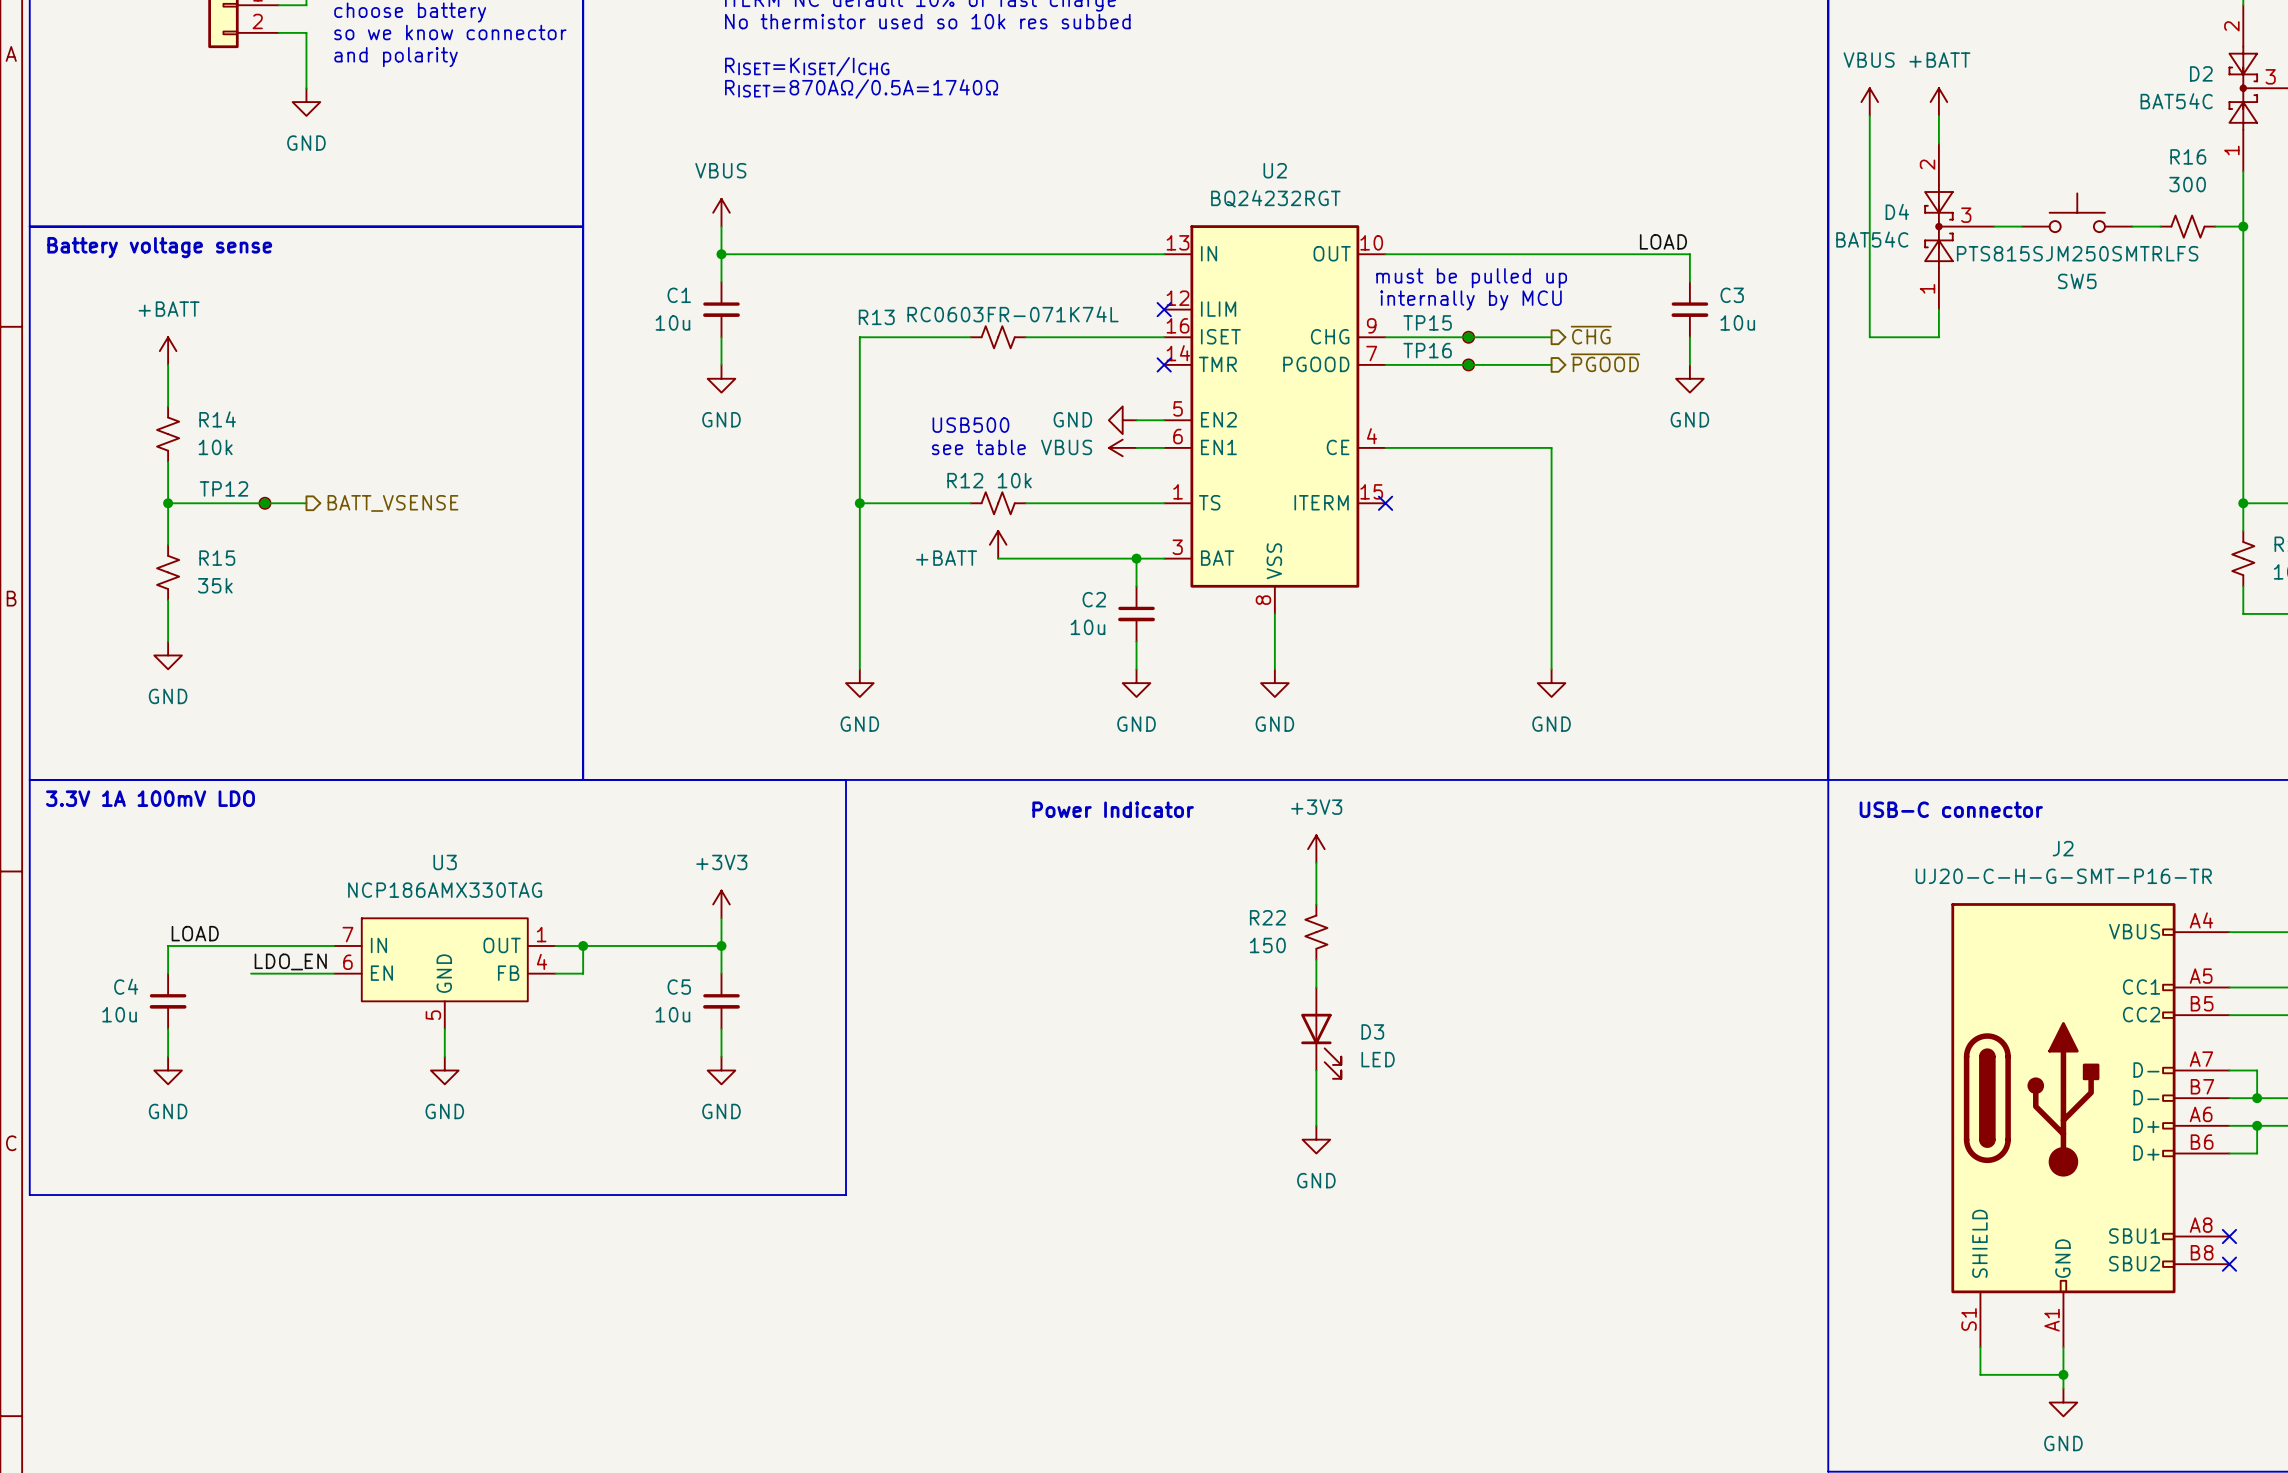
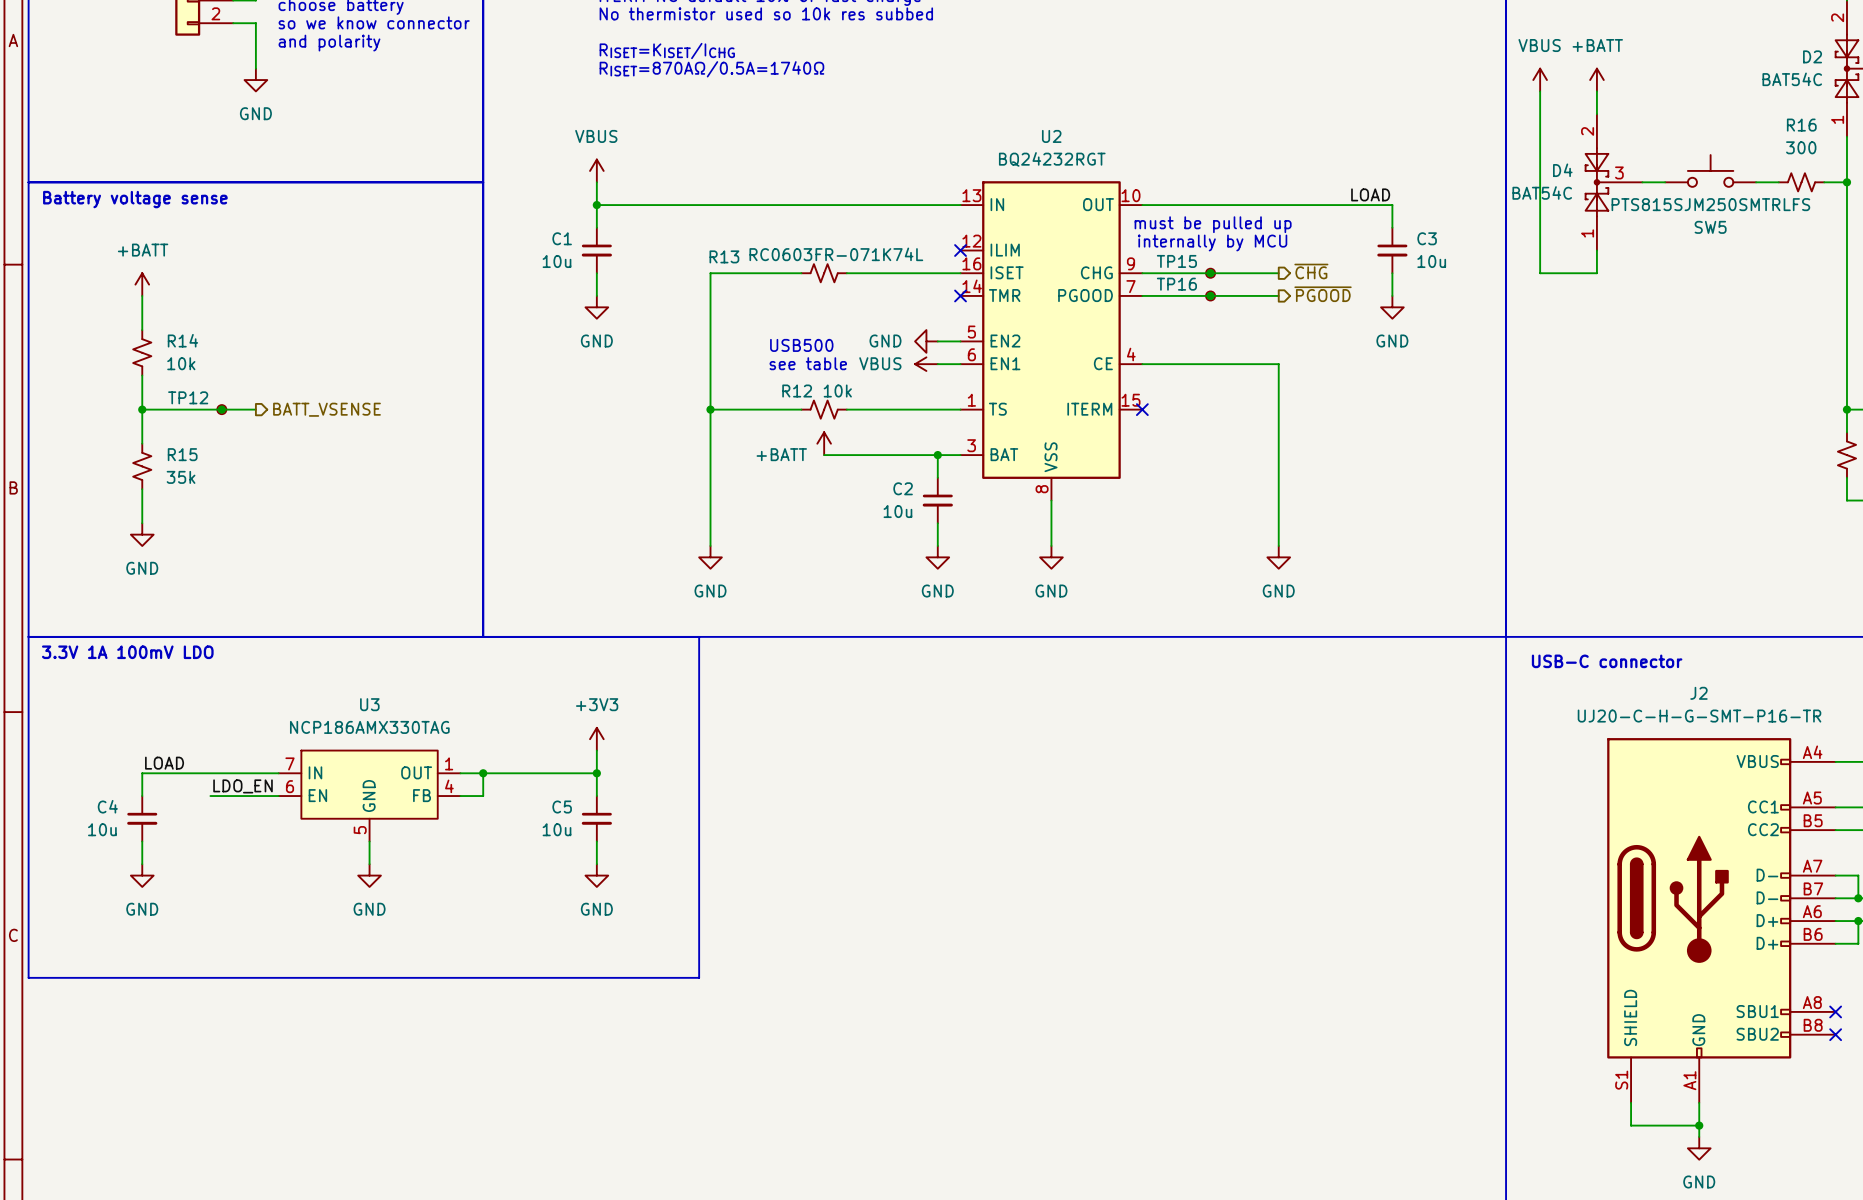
text: Power Indicator (1113, 809) -> none
power symbol: +3V3 (1316, 849) -> none
wire: (1316, 862) (1316, 904) -> none
R22: 150 (1316, 932) -> none
wire: (1316, 959) (1316, 987) -> none
D3: LED (1321, 1033) -> none
wire: (1316, 1070) (1316, 1125) -> none
power symbol: GND (1316, 1139) -> none

